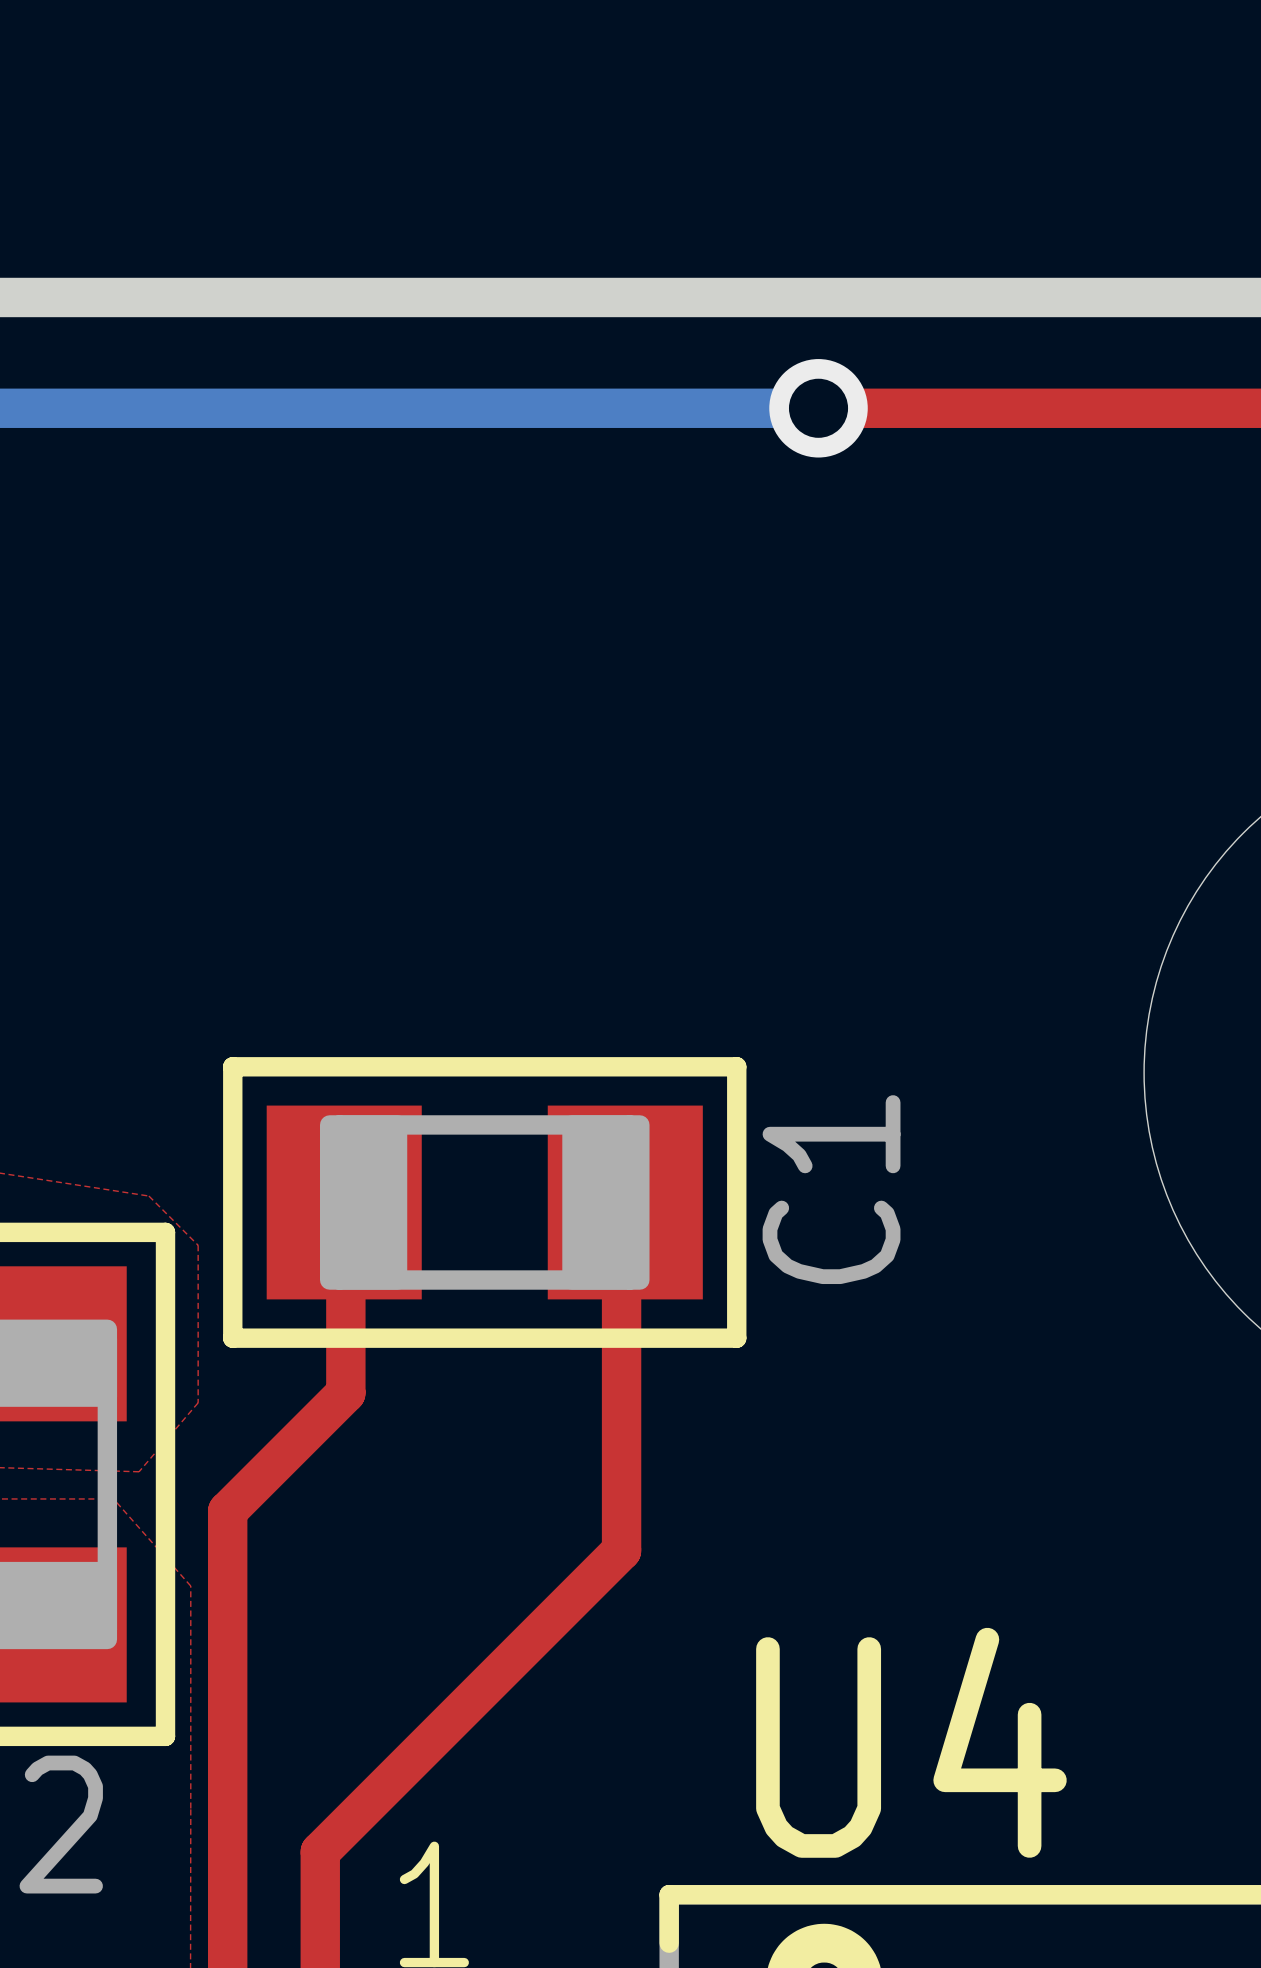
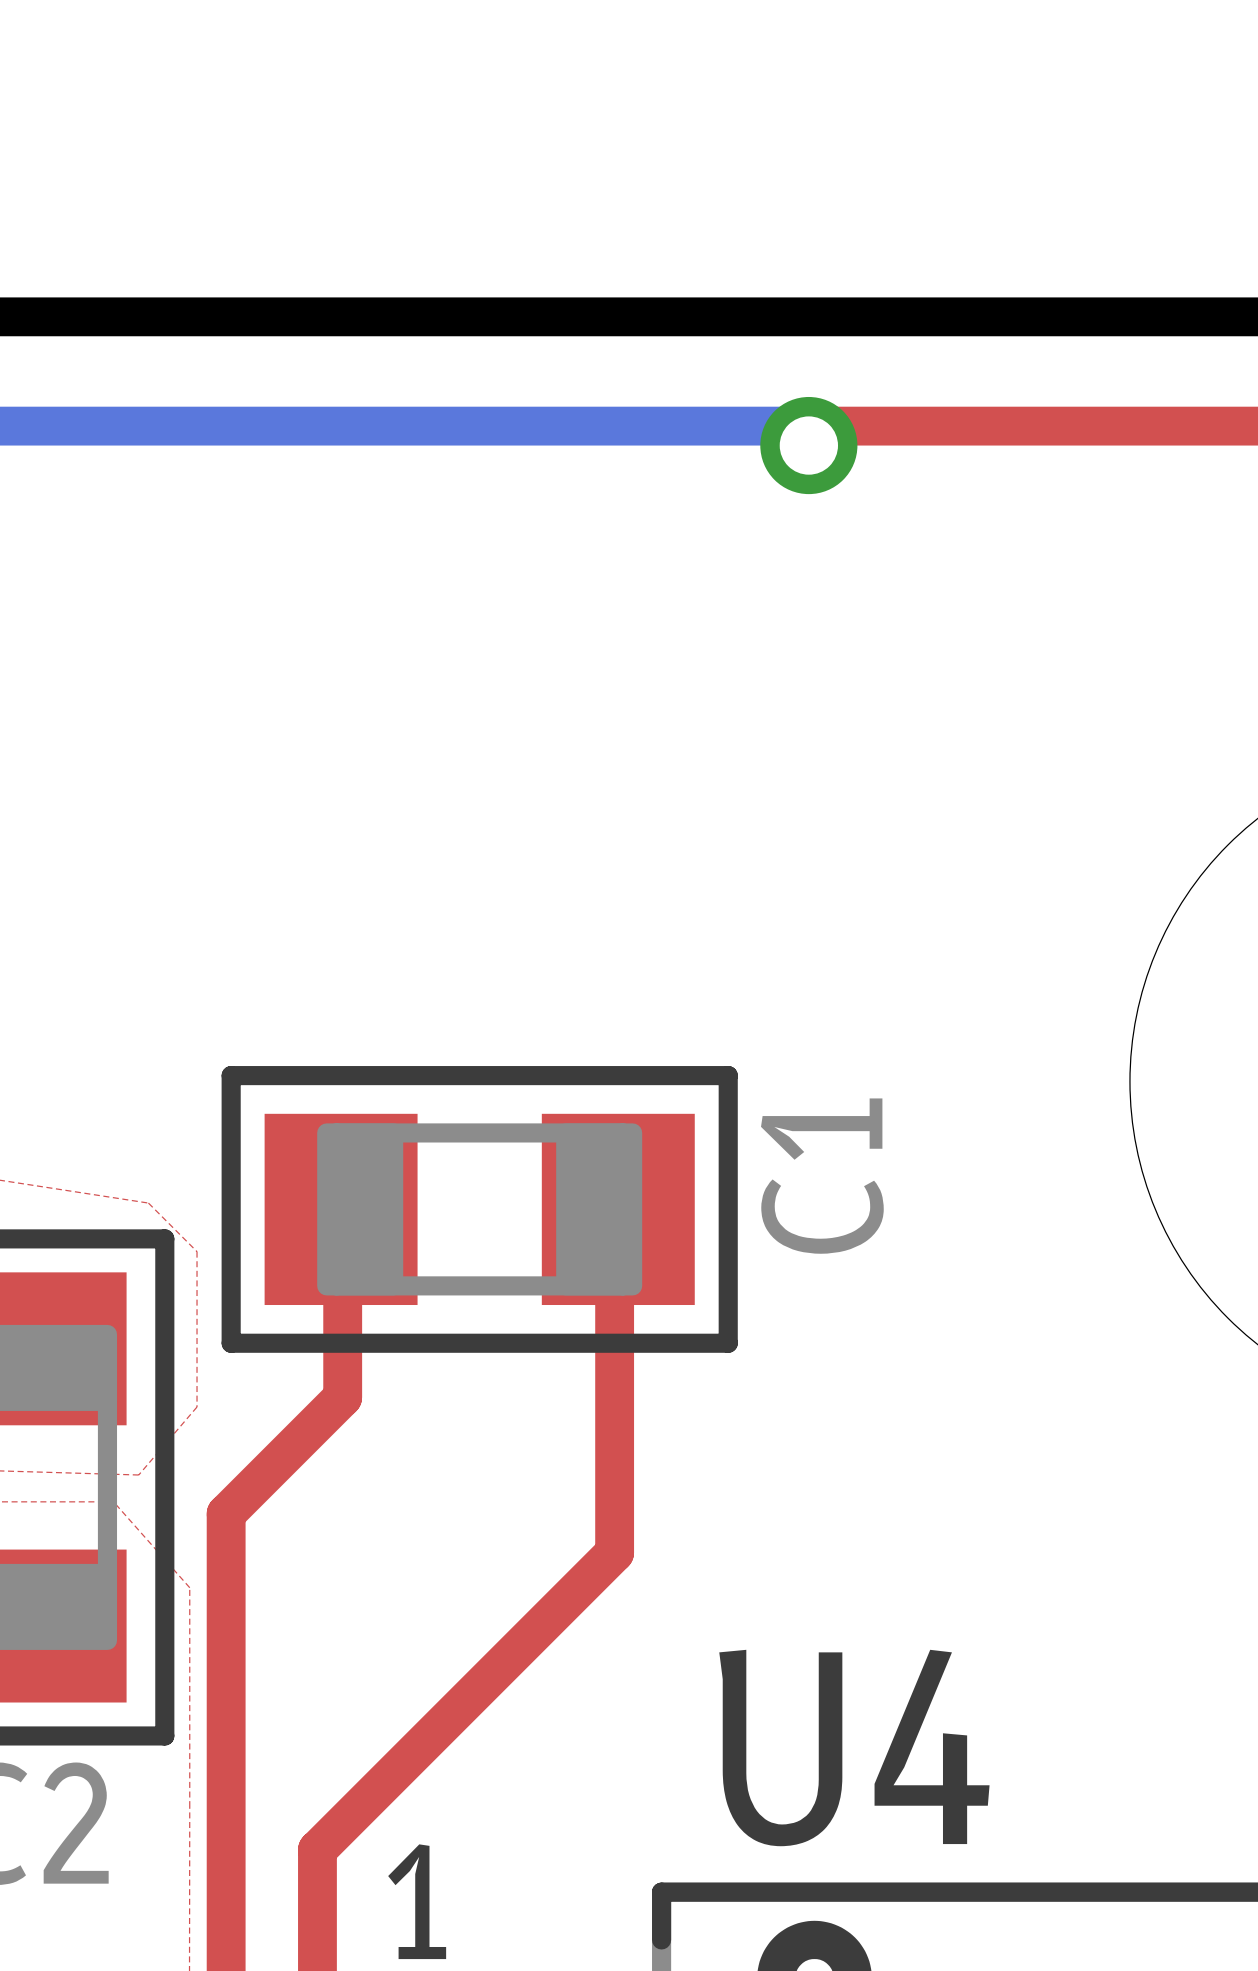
via position: (818, 408) -> (808, 445)

